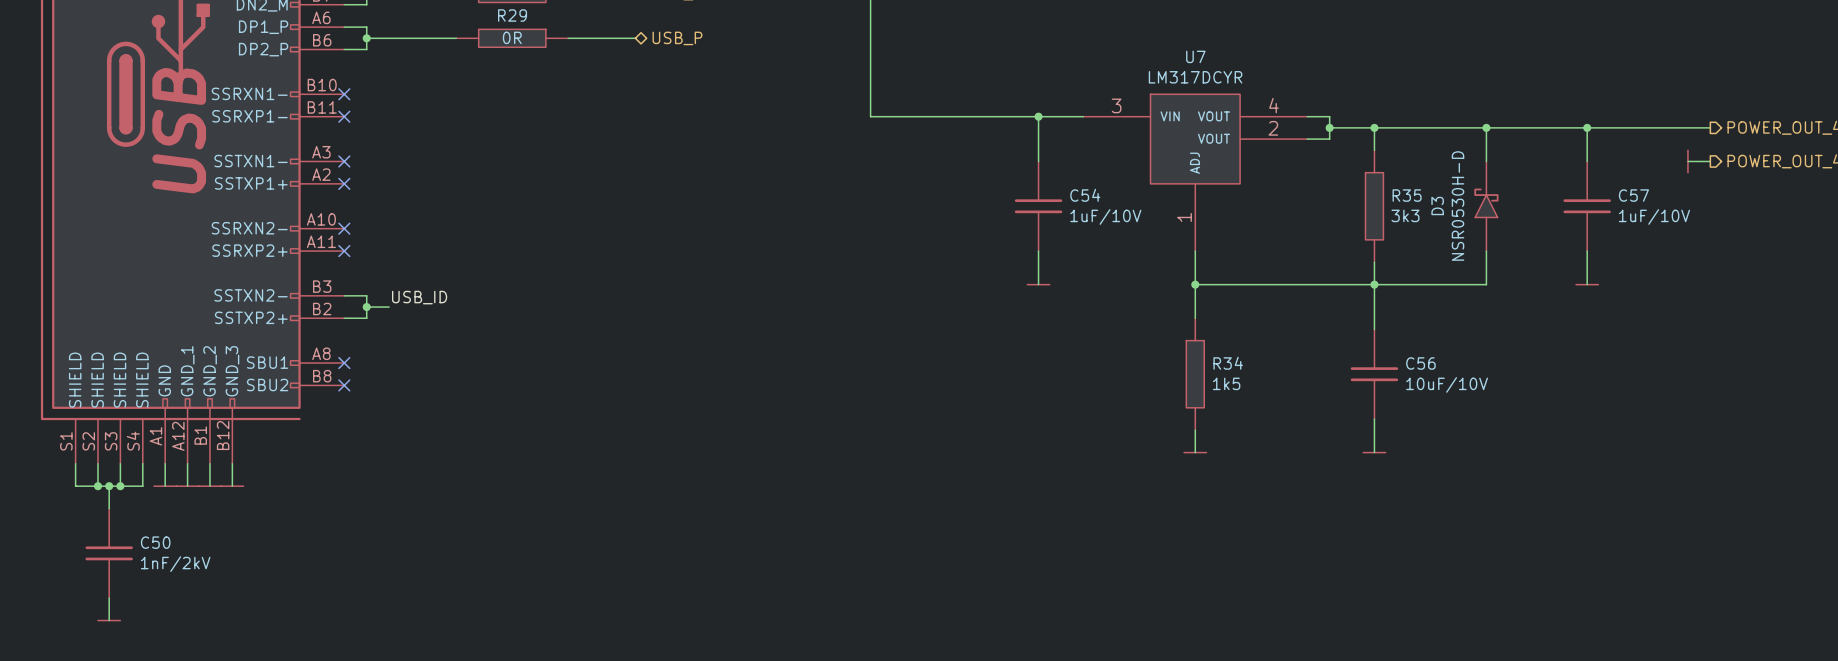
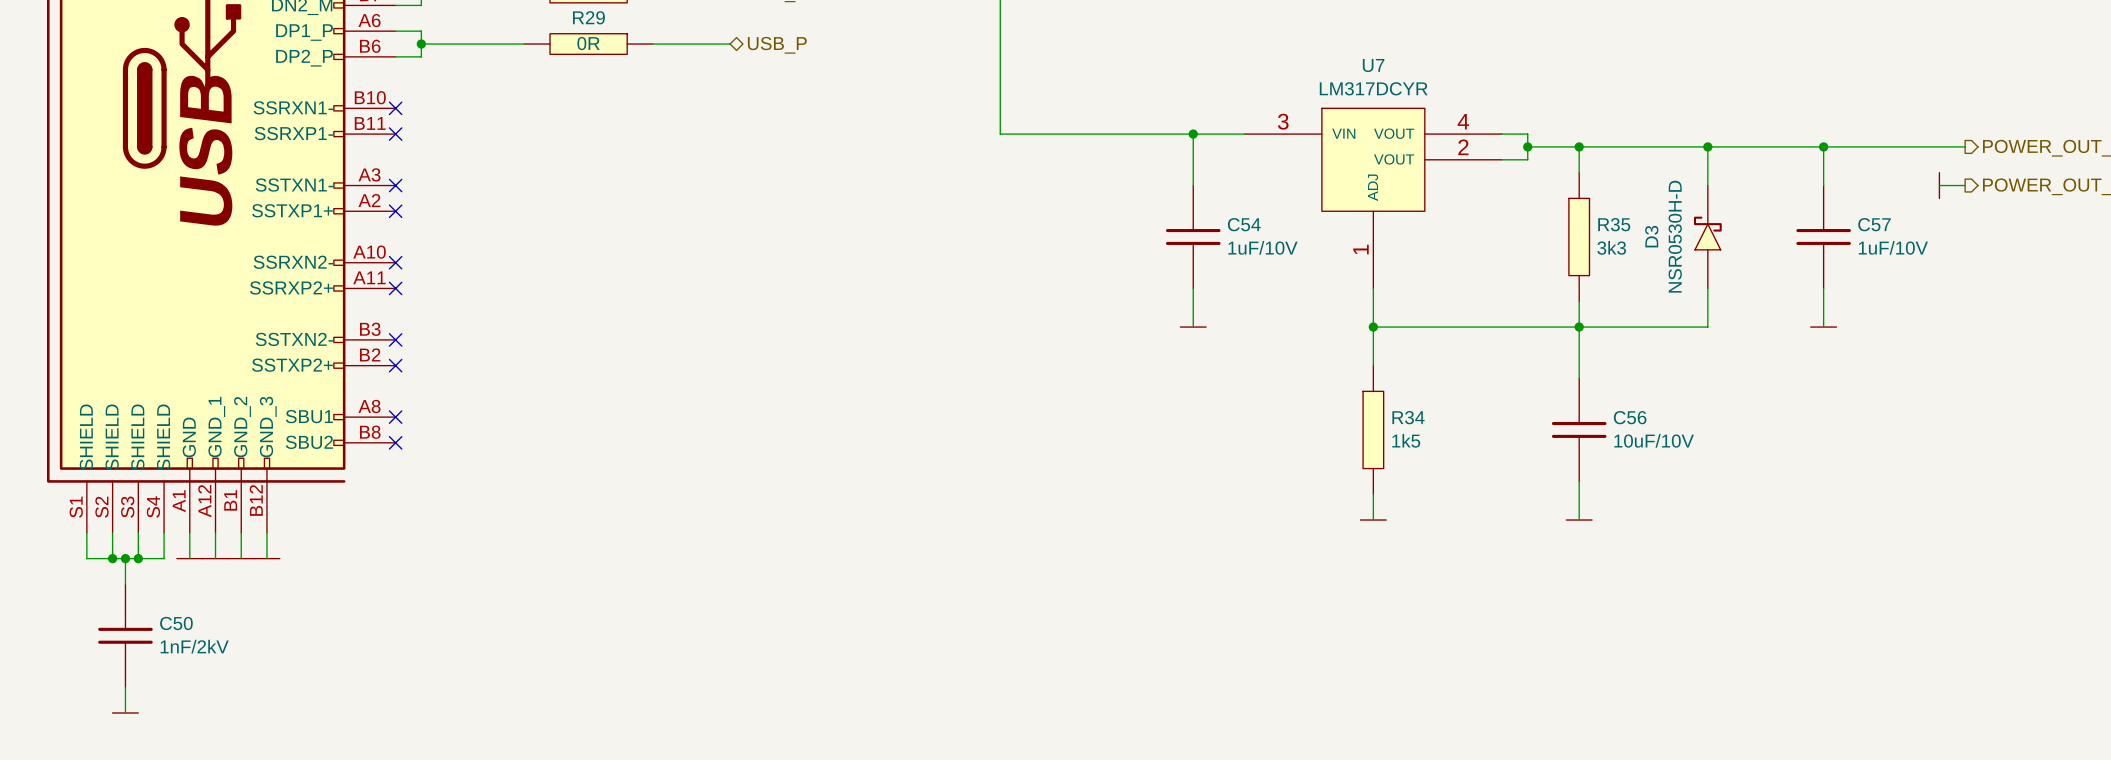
wire: (344, 295) (366, 295) (366, 318) (344, 318) -> none
no-connect mark: none -> (395, 339)
label: USB_ID (419, 297) -> none
wire: (366, 307) (389, 307) -> none
junction: (366, 307) -> none
no-connect mark: none -> (395, 365)

